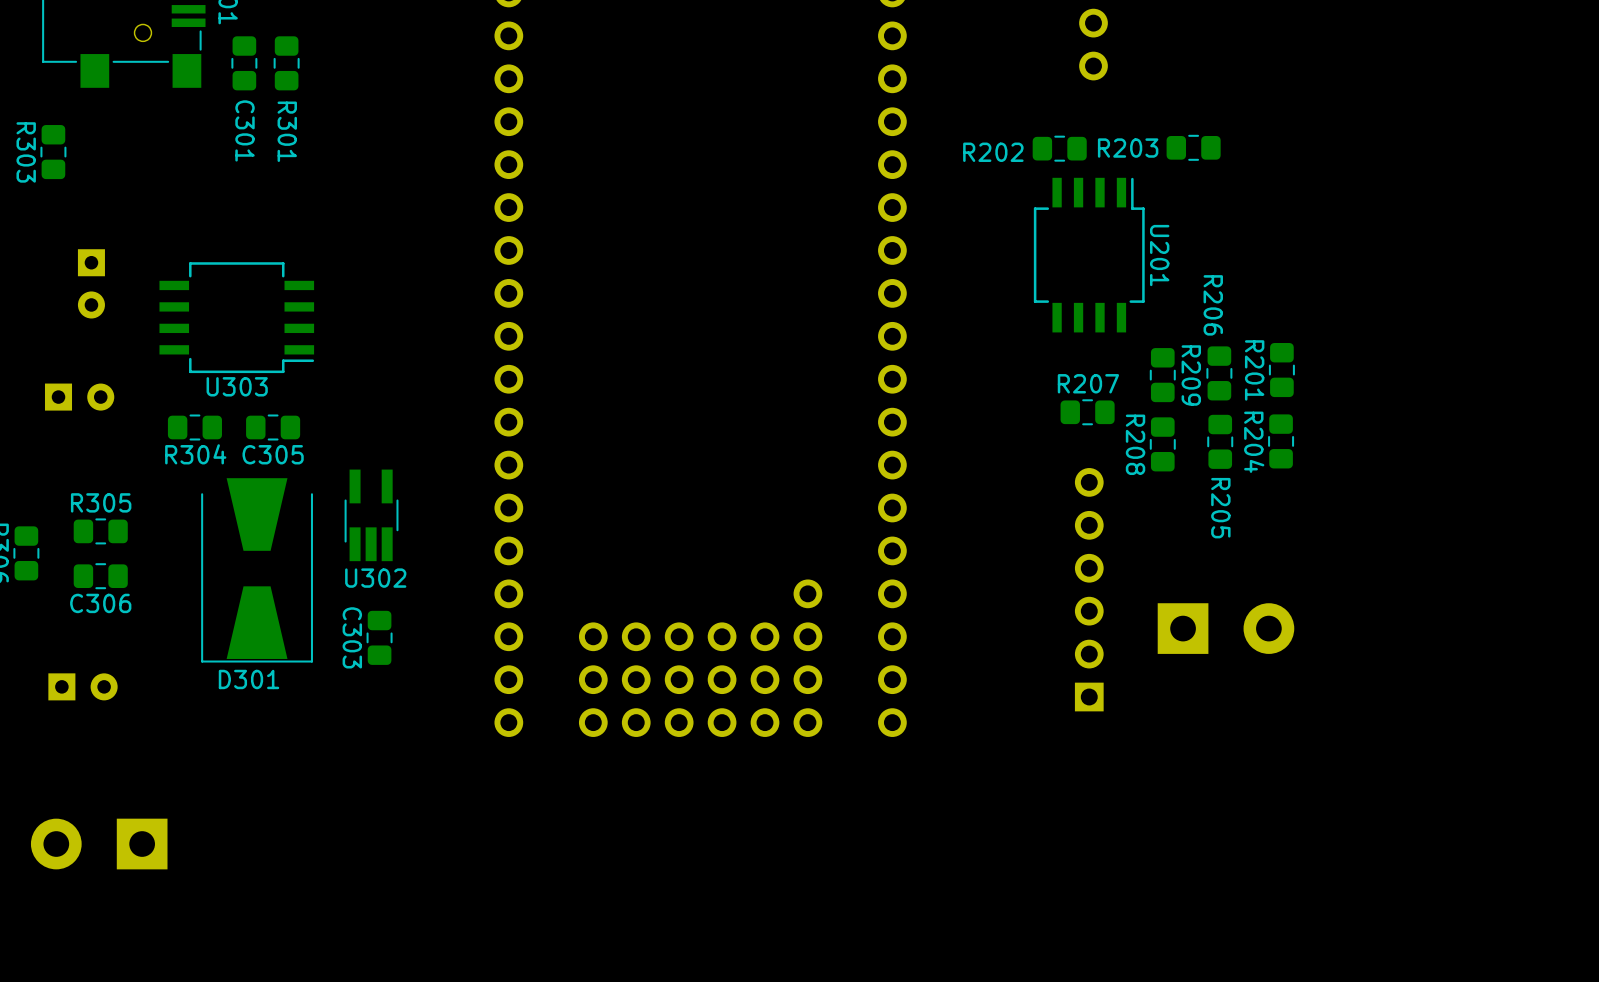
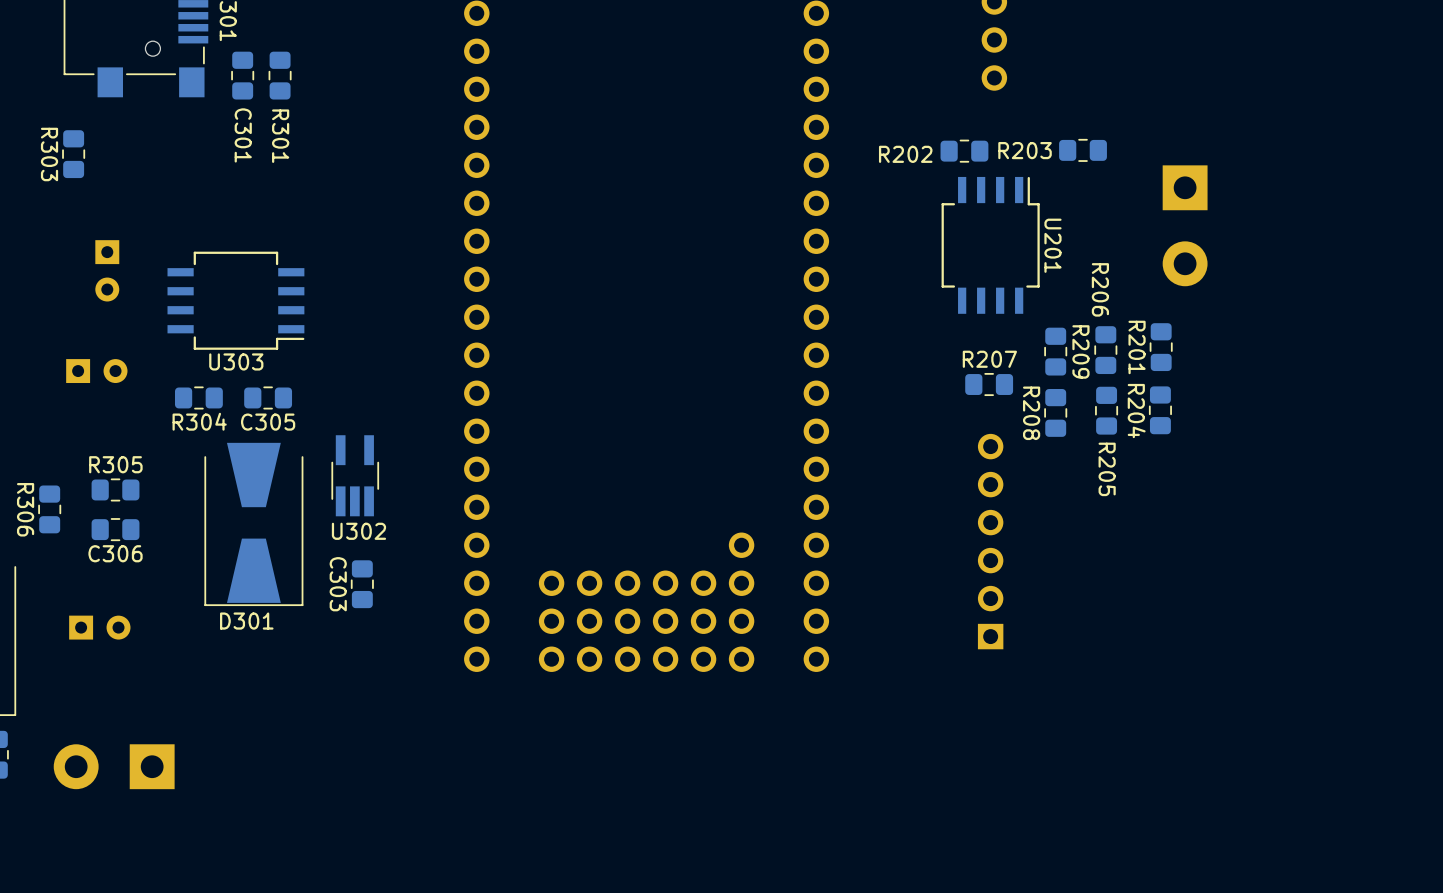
part rotation: 0° (1225, 628) -> 90° clockwise (1185, 225)
part position: (1225, 628) -> (1185, 225)

